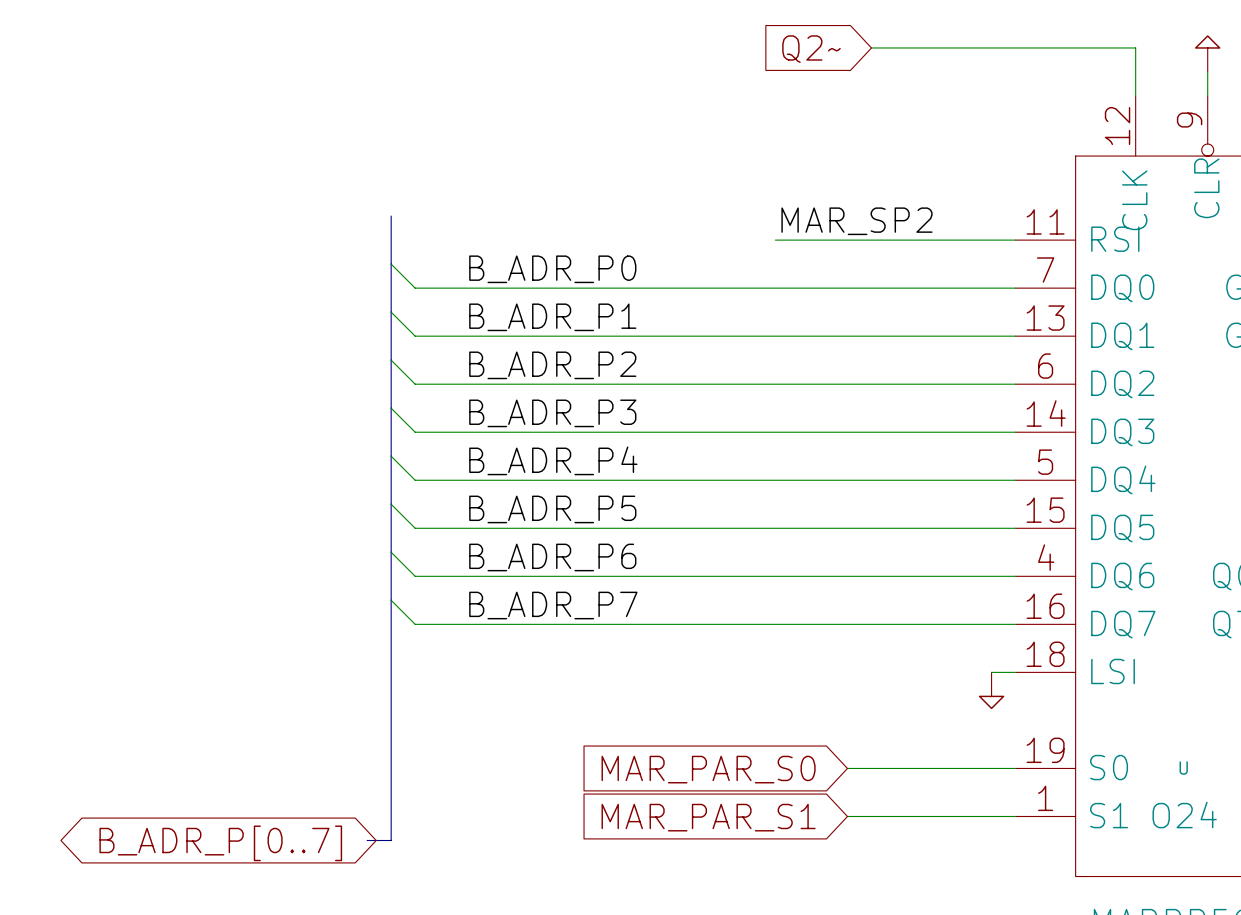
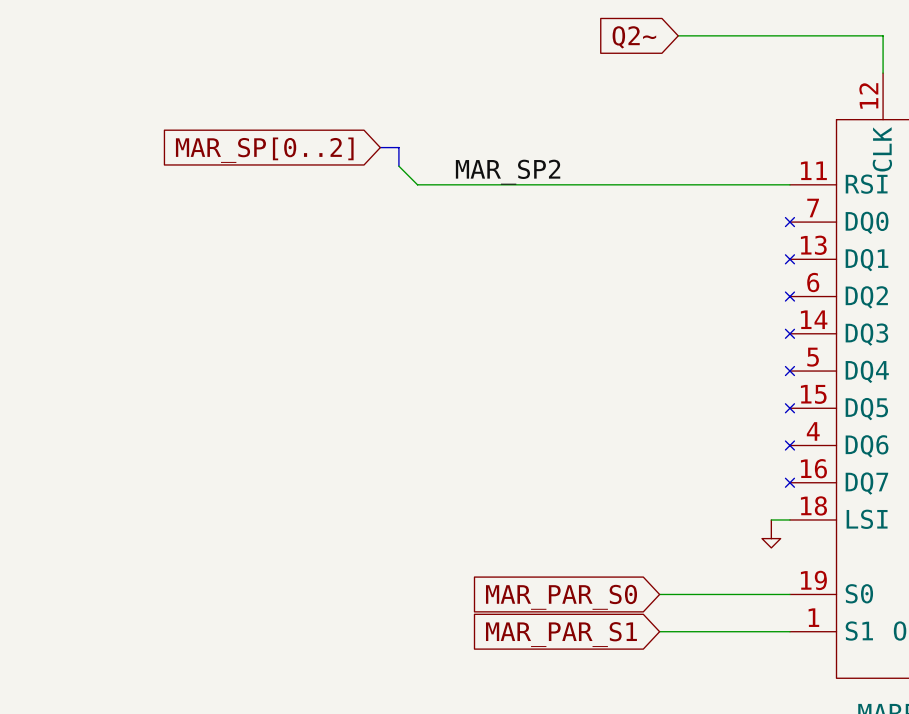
bus: none -> (380, 147) (398, 147) (398, 166)
global label: none -> MAR_SP[0..2] (264, 150)
bus: (391, 216) (391, 840) (367, 840) -> none
wire: none -> (398, 166) (417, 184) (603, 184)
label position: MAR_SP2 (856, 221) -> MAR_SP2 (508, 172)
wire: (391, 264) (415, 288) (1015, 288) -> none
label: B_ADR_P0 (552, 269) -> none
no-connect mark: none -> (789, 222)
wire: (391, 312) (415, 336) (1015, 336) -> none
label: B_ADR_P1 (552, 317) -> none
no-connect mark: none -> (789, 259)
wire: (391, 360) (415, 384) (1015, 384) -> none
label: B_ADR_P2 (552, 365) -> none
no-connect mark: none -> (789, 296)
wire: (391, 408) (415, 432) (1015, 432) -> none
label: B_ADR_P3 (552, 413) -> none
no-connect mark: none -> (789, 333)
wire: (391, 456) (415, 480) (1015, 480) -> none
label: B_ADR_P4 (553, 460) -> none
no-connect mark: none -> (789, 371)
wire: (391, 504) (415, 528) (1015, 528) -> none
label: B_ADR_P5 (552, 509) -> none
no-connect mark: none -> (789, 408)
wire: (391, 552) (415, 576) (1015, 576) -> none
label: B_ADR_P6 (552, 557) -> none
no-connect mark: none -> (789, 445)
wire: (391, 600) (415, 624) (1015, 624) -> none
label: B_ADR_P7 (553, 605) -> none
no-connect mark: none -> (789, 482)
global label: B_ADR_P[0..7] (220, 843) -> none

